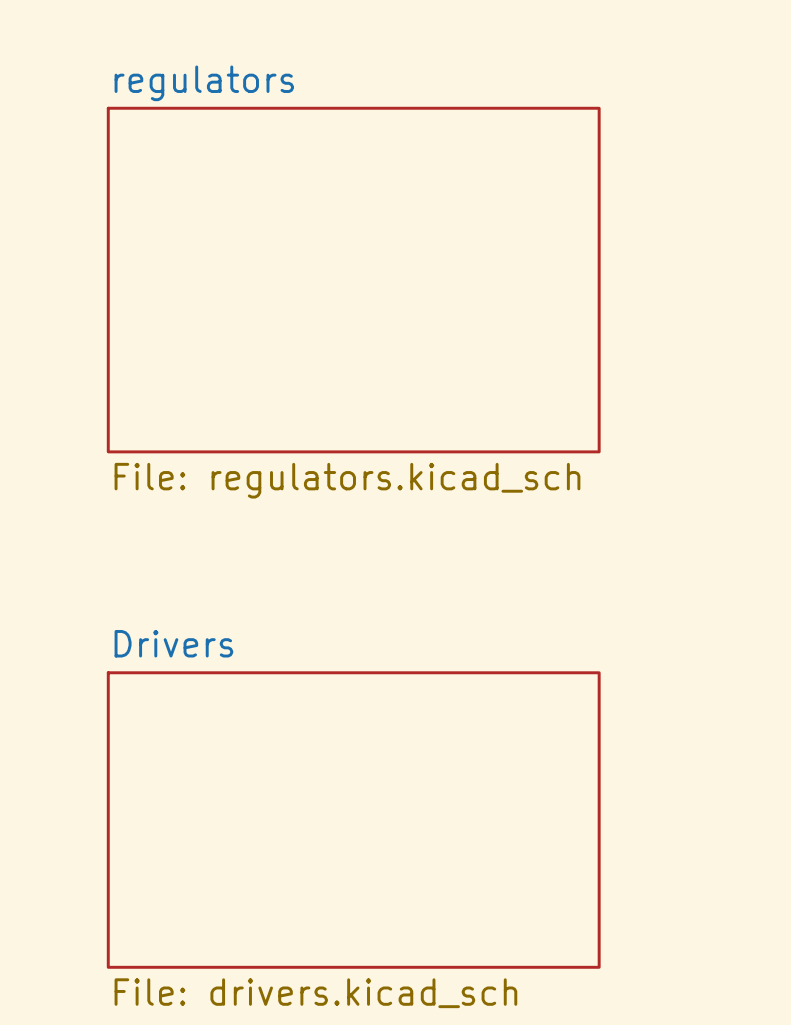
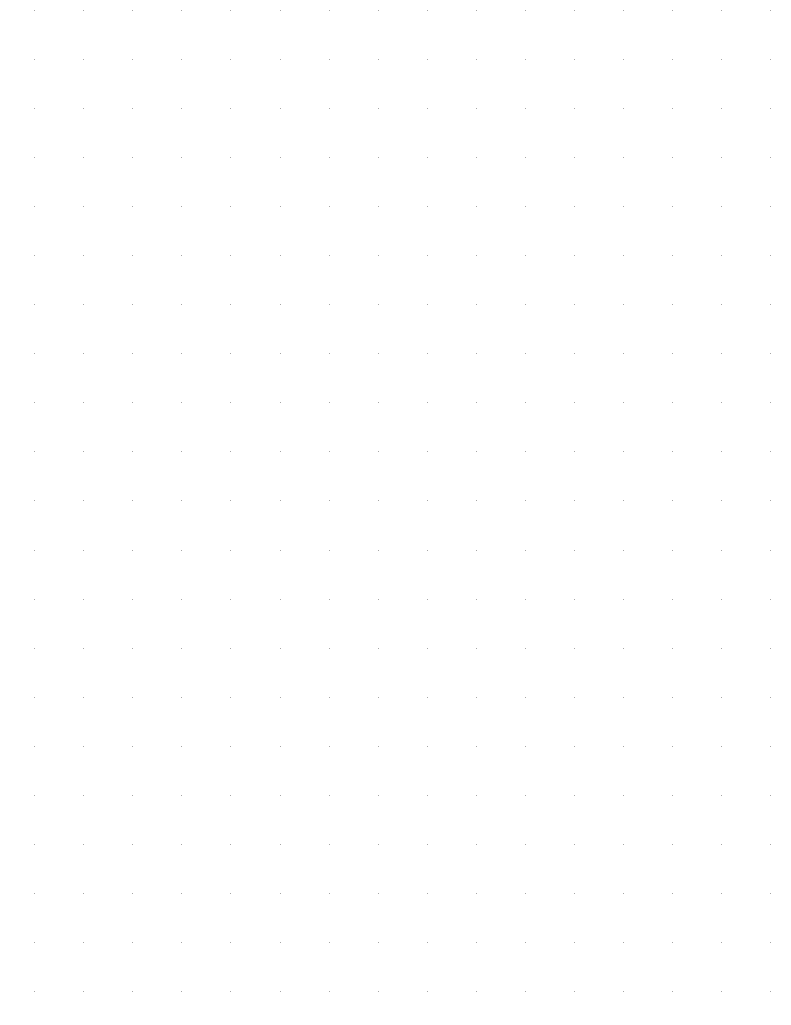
sheet regulators: File: regulators.kicad_sch (353, 280) -> none
sheet Drivers: File: drivers.kicad_sch (353, 820) -> none

